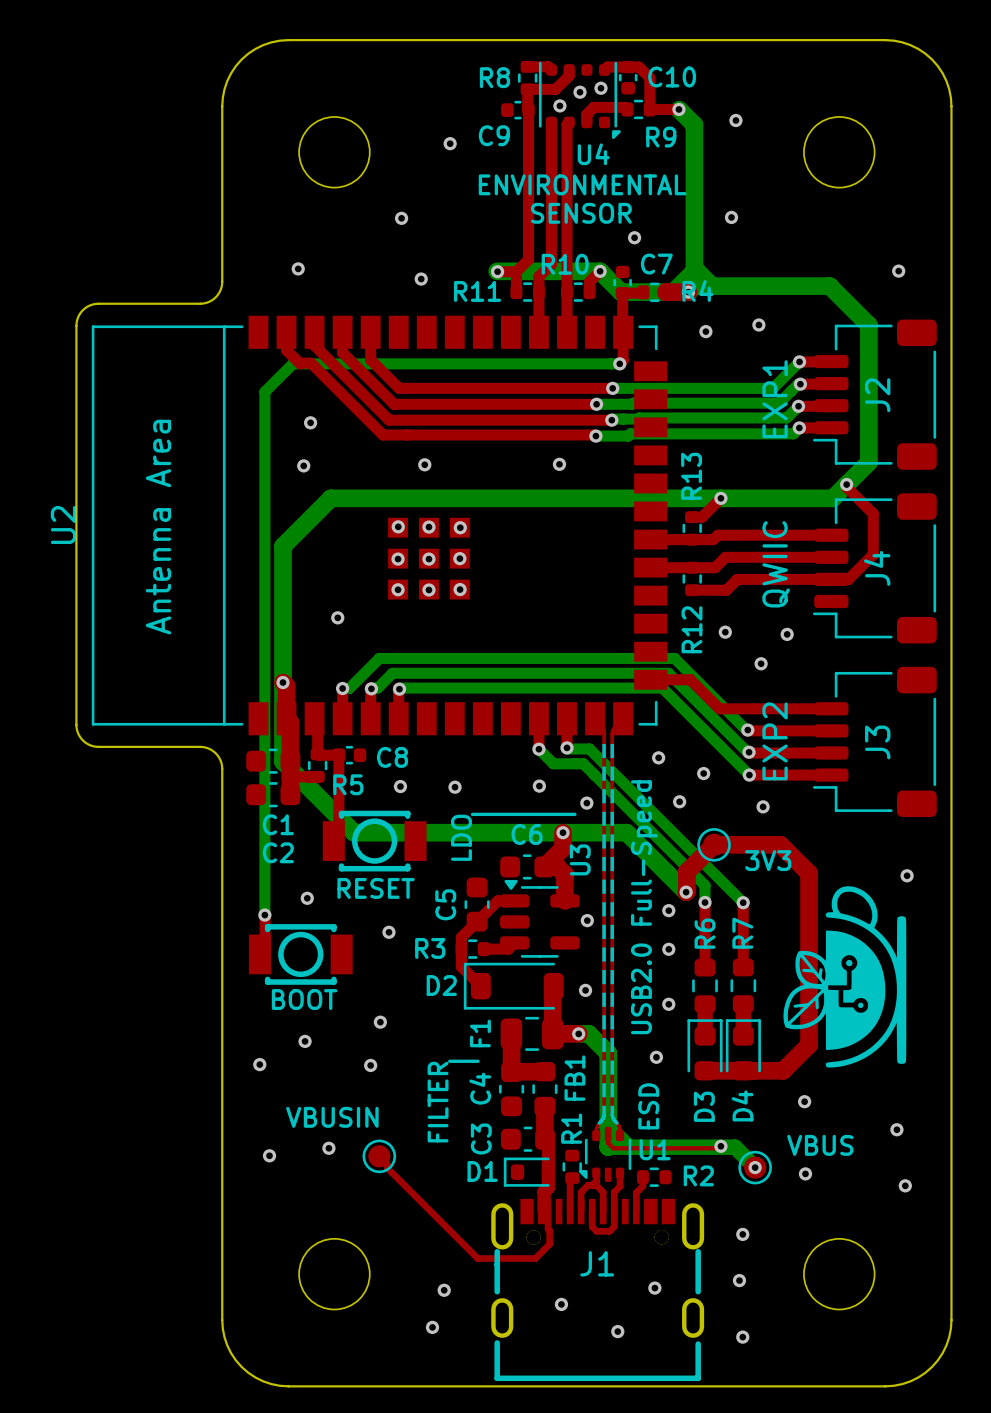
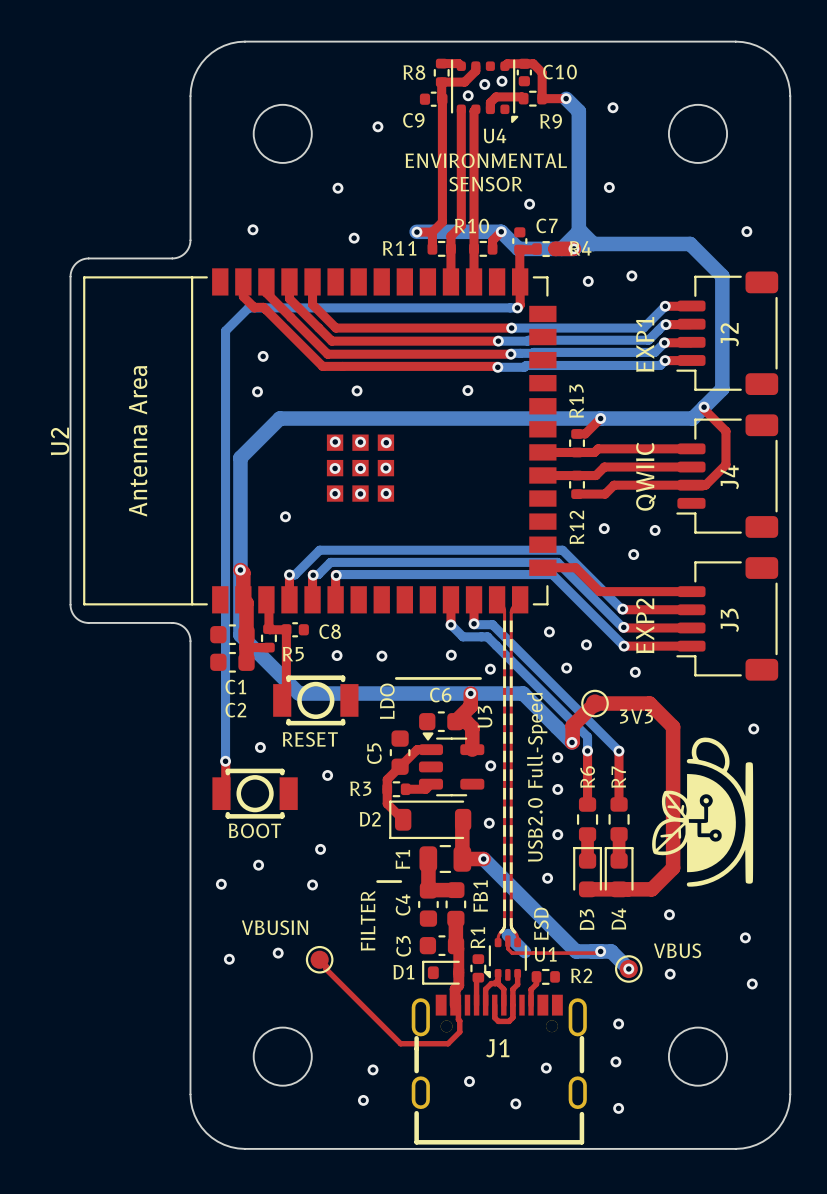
bottom track: (578, 1033) (588, 1033) (608, 1053) (608, 1147) (735, 1147) (755, 1167) -> (483, 859) (576, 951) (611, 951) (628, 968)

